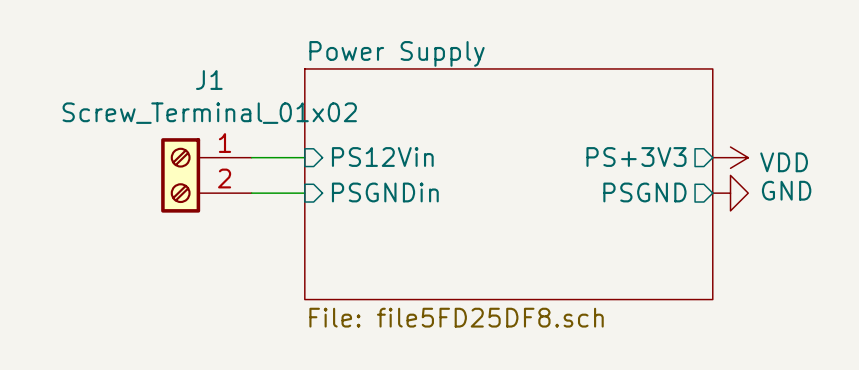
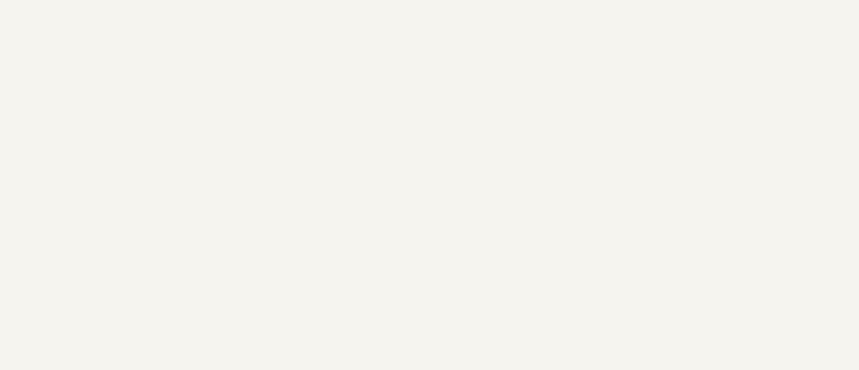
wire: (251, 157) (304, 157) -> none
sheet pin: PS12Vin (382, 157) -> none
sheet pin: PS+3V3 (636, 157) -> none
power symbol: VDD (730, 157) -> none
J1: Screw_Terminal_01x02 (206, 175) -> none
sheet Power Supply: File: file5FD25DF8.sch (508, 184) -> none
sheet pin: PSGNDin (385, 192) -> none
sheet pin: PSGND (644, 192) -> none
wire: (251, 193) (304, 193) -> none
power symbol: GND (730, 193) -> none

